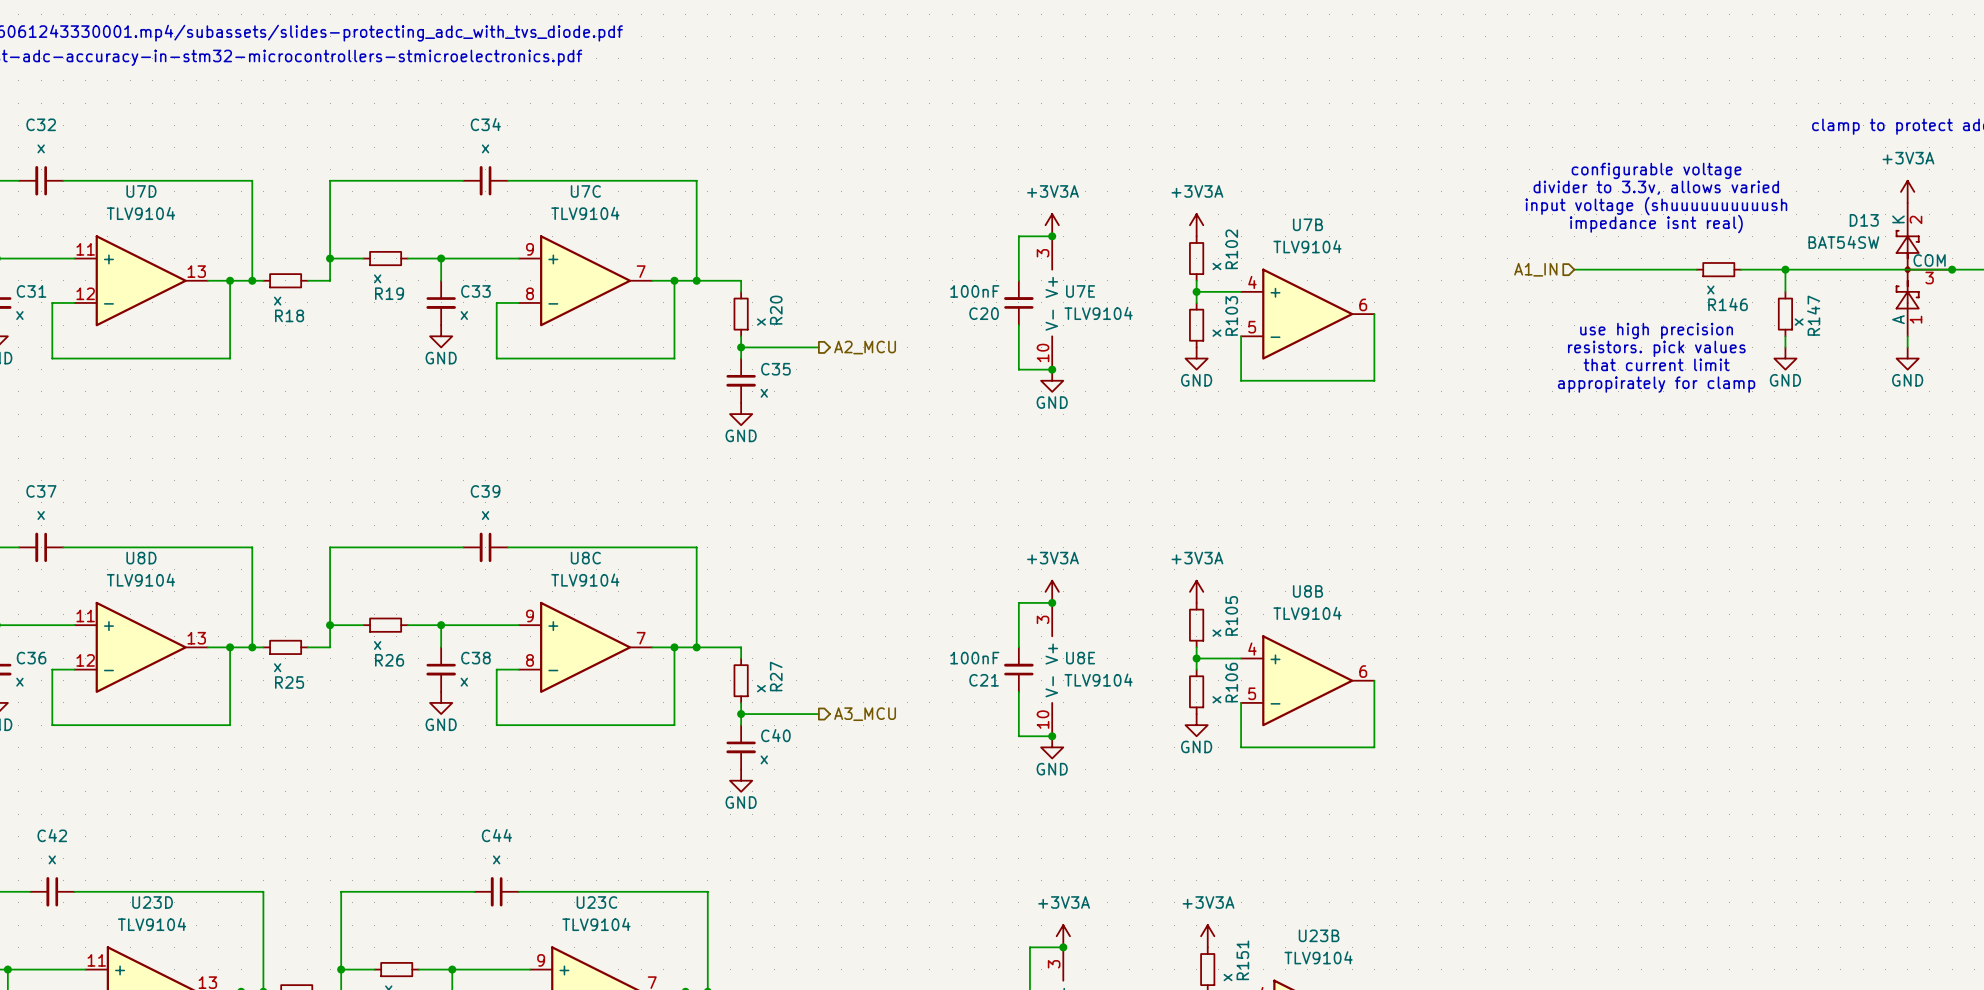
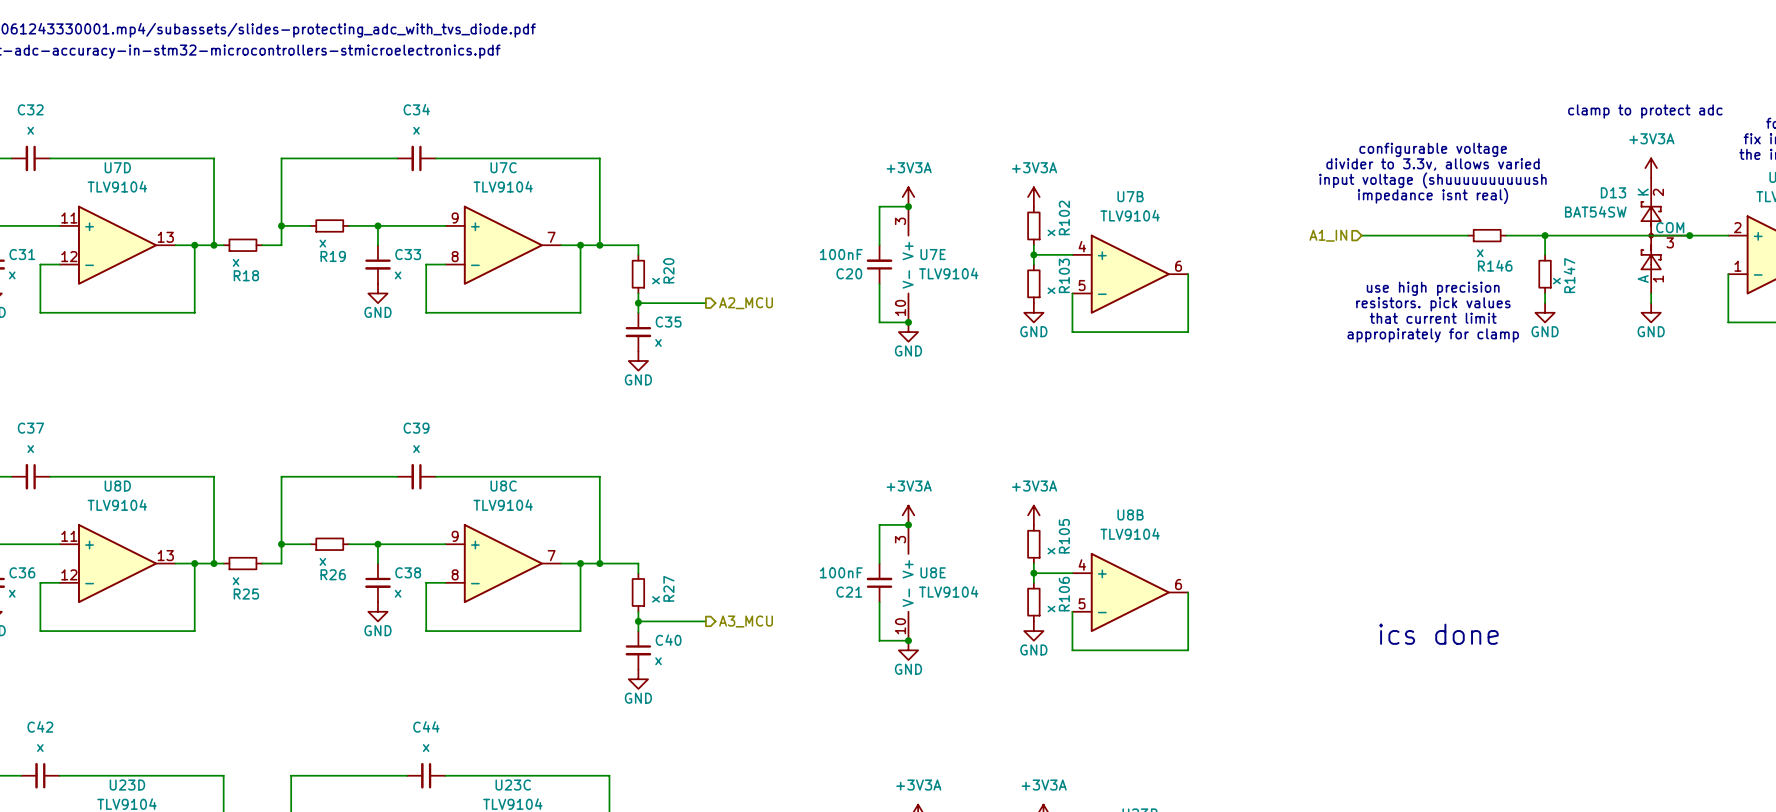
text: none -> ics done (1438, 634)

